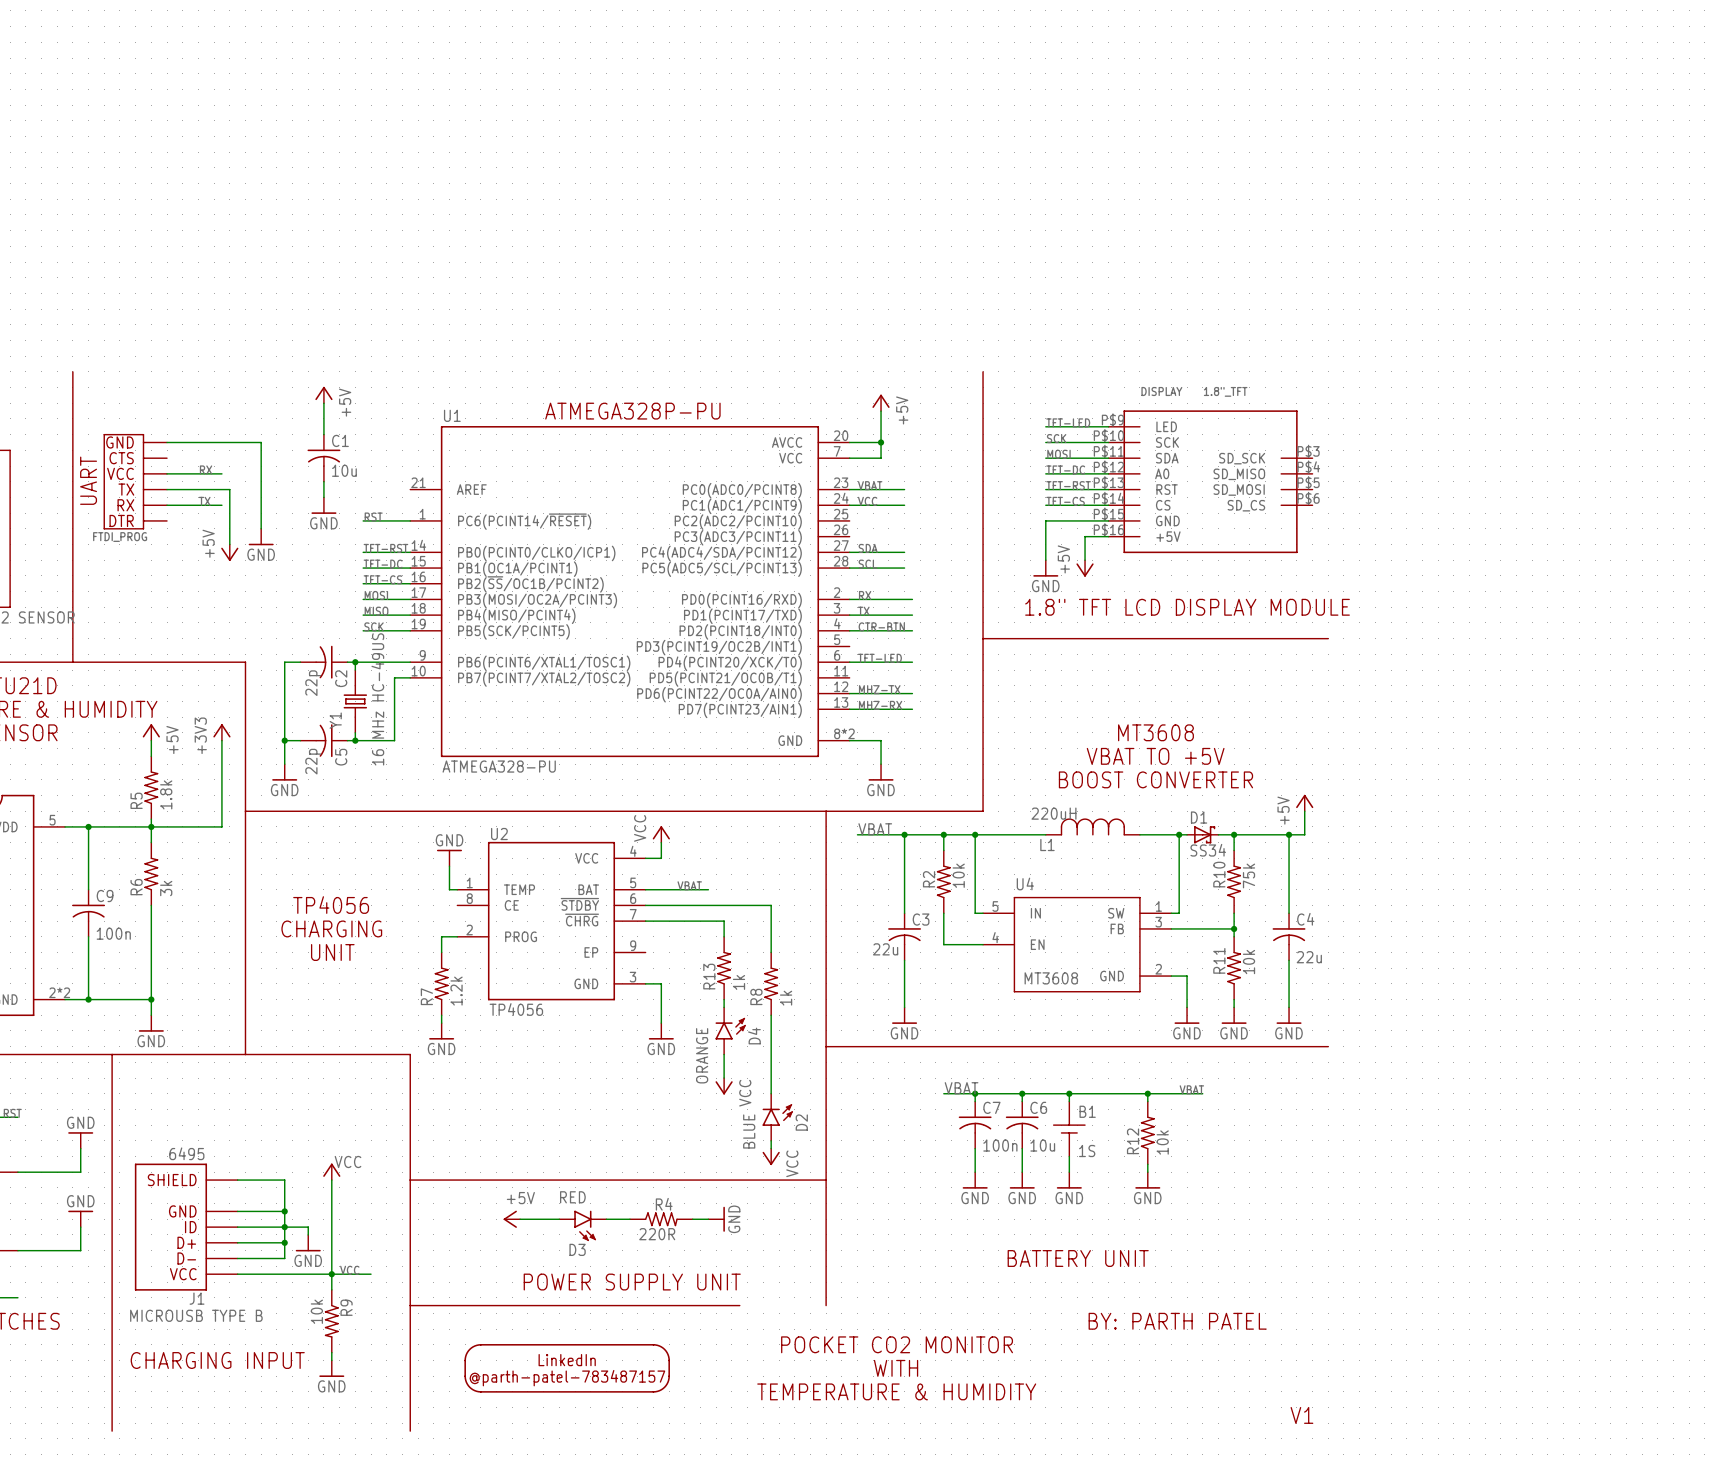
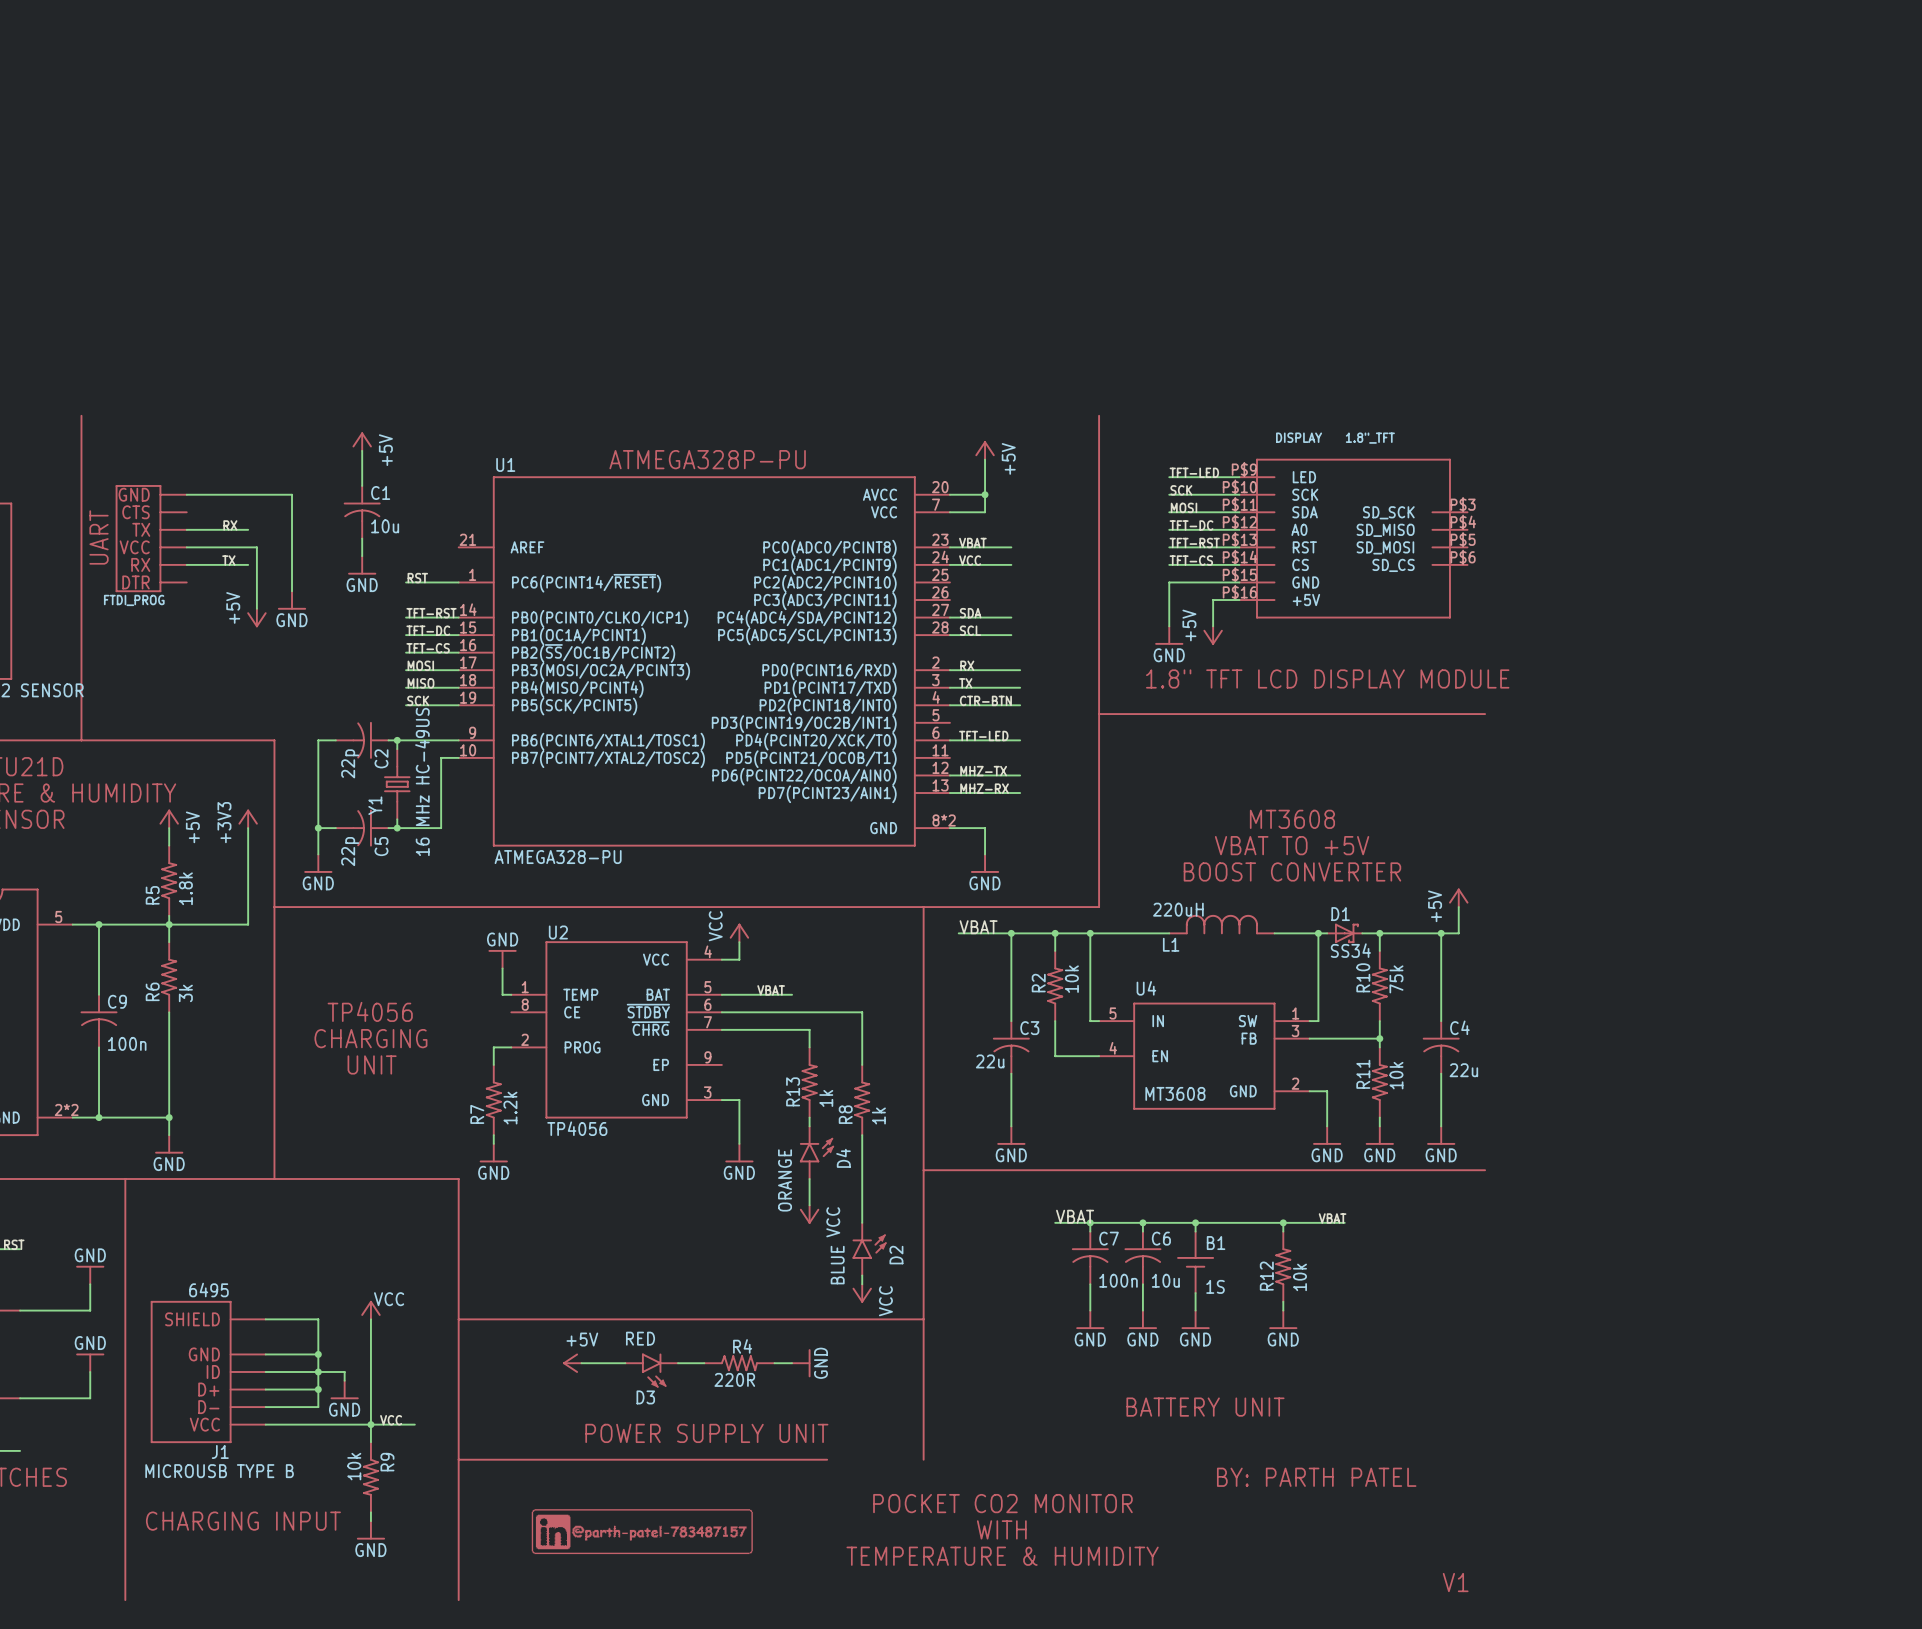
FTDI_PROG text: VCC (120, 473) -> TX (141, 529)
FTDI_PROG text: TX (126, 489) -> VCC (134, 547)
drawing: none -> [531, 1509, 753, 1555]
part: (567, 1368) -> none

